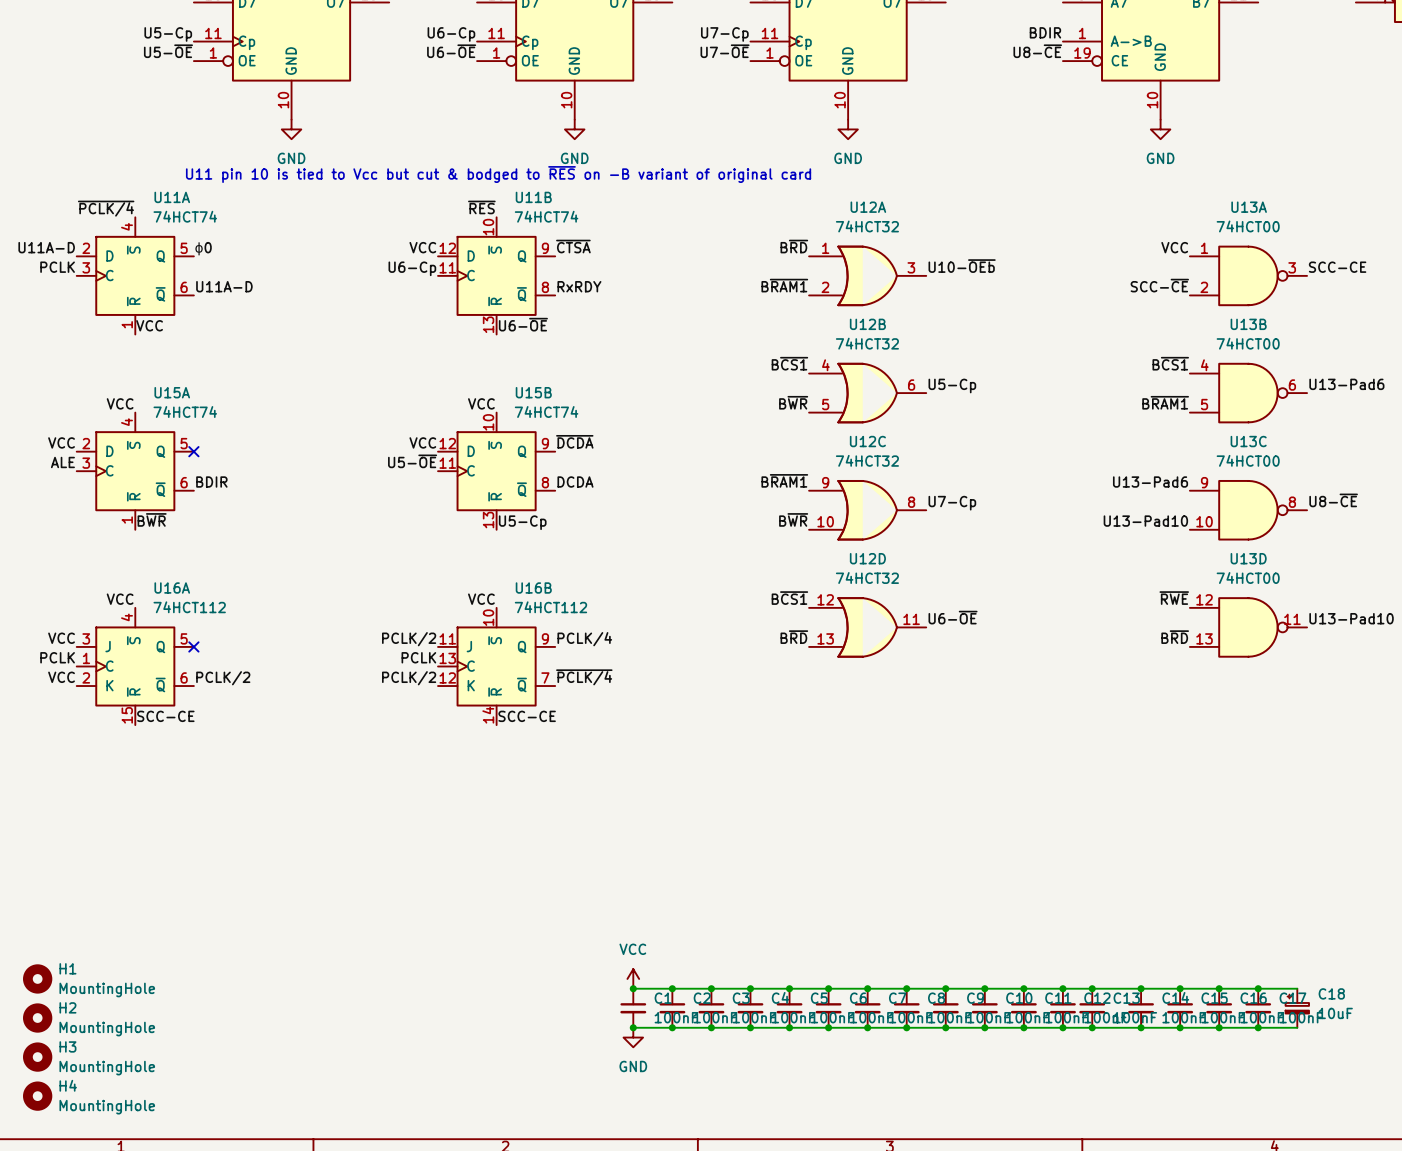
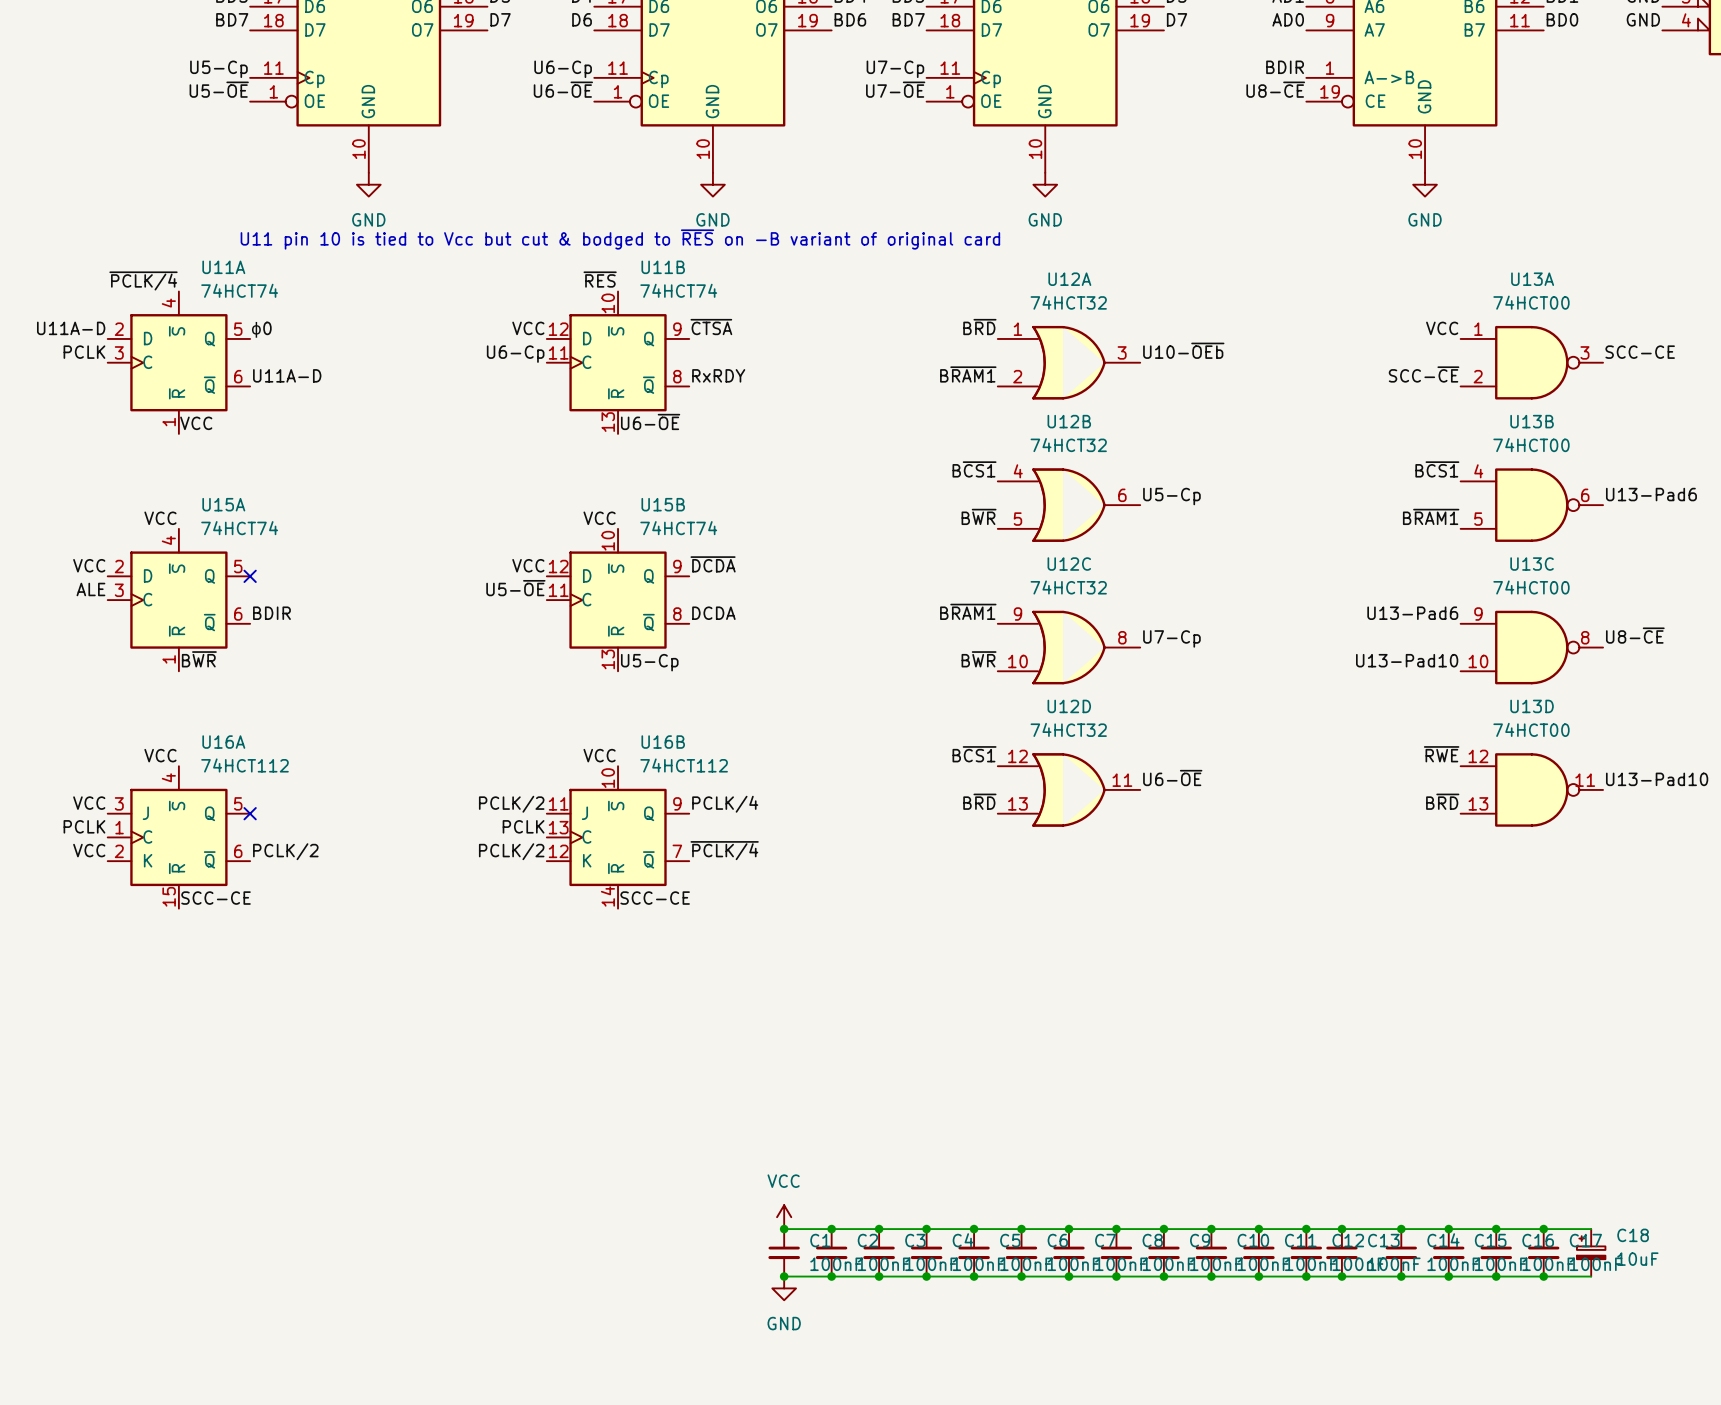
H1: MountingHole (37, 978) -> none
H2: MountingHole (37, 1018) -> none
H3: MountingHole (37, 1057) -> none
H4: MountingHole (37, 1096) -> none

